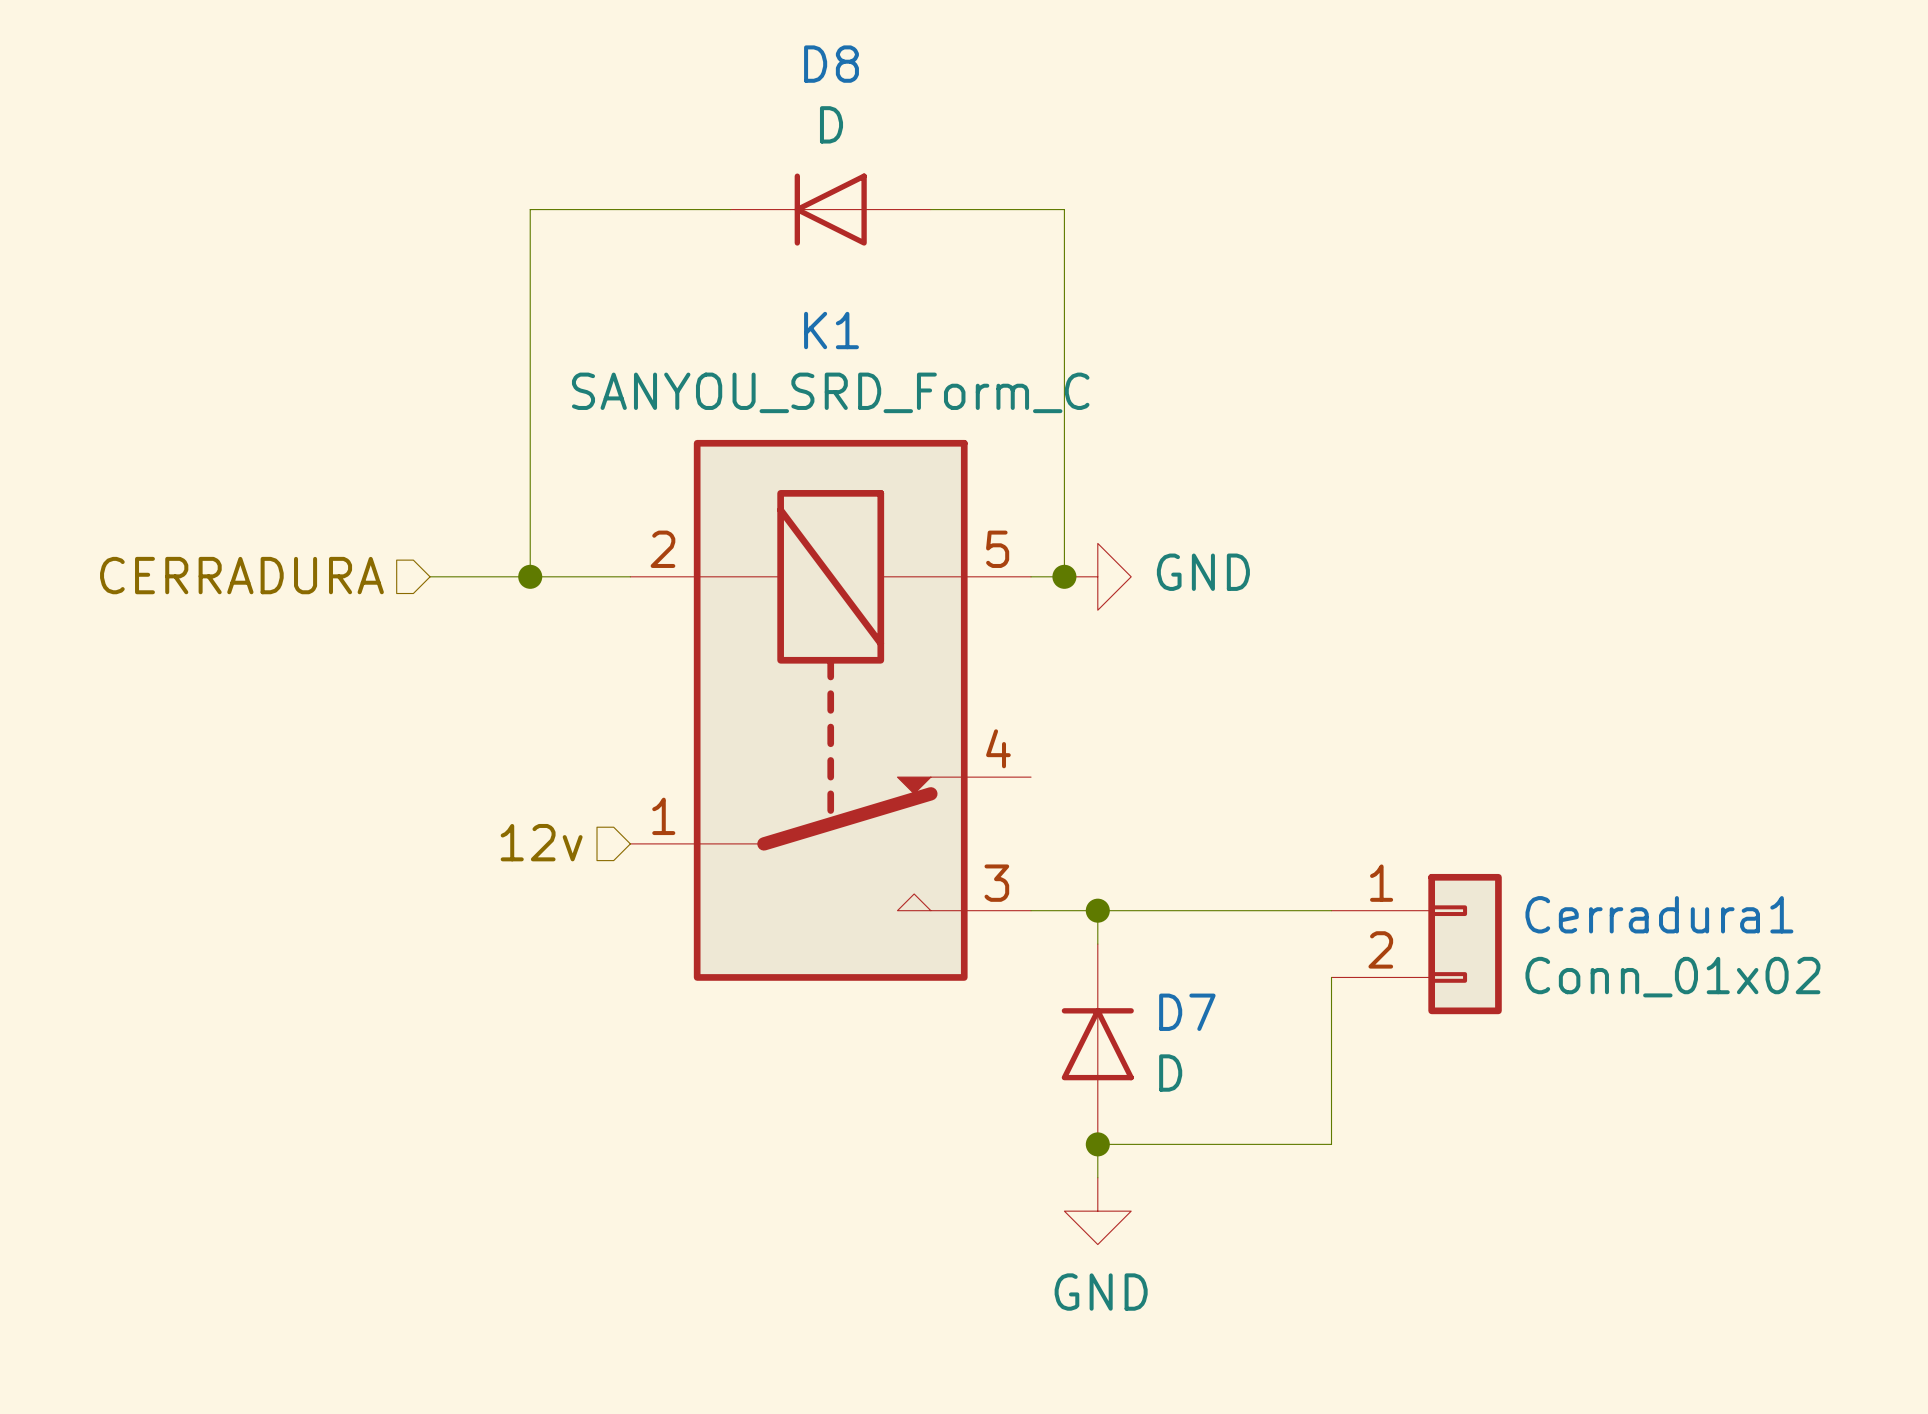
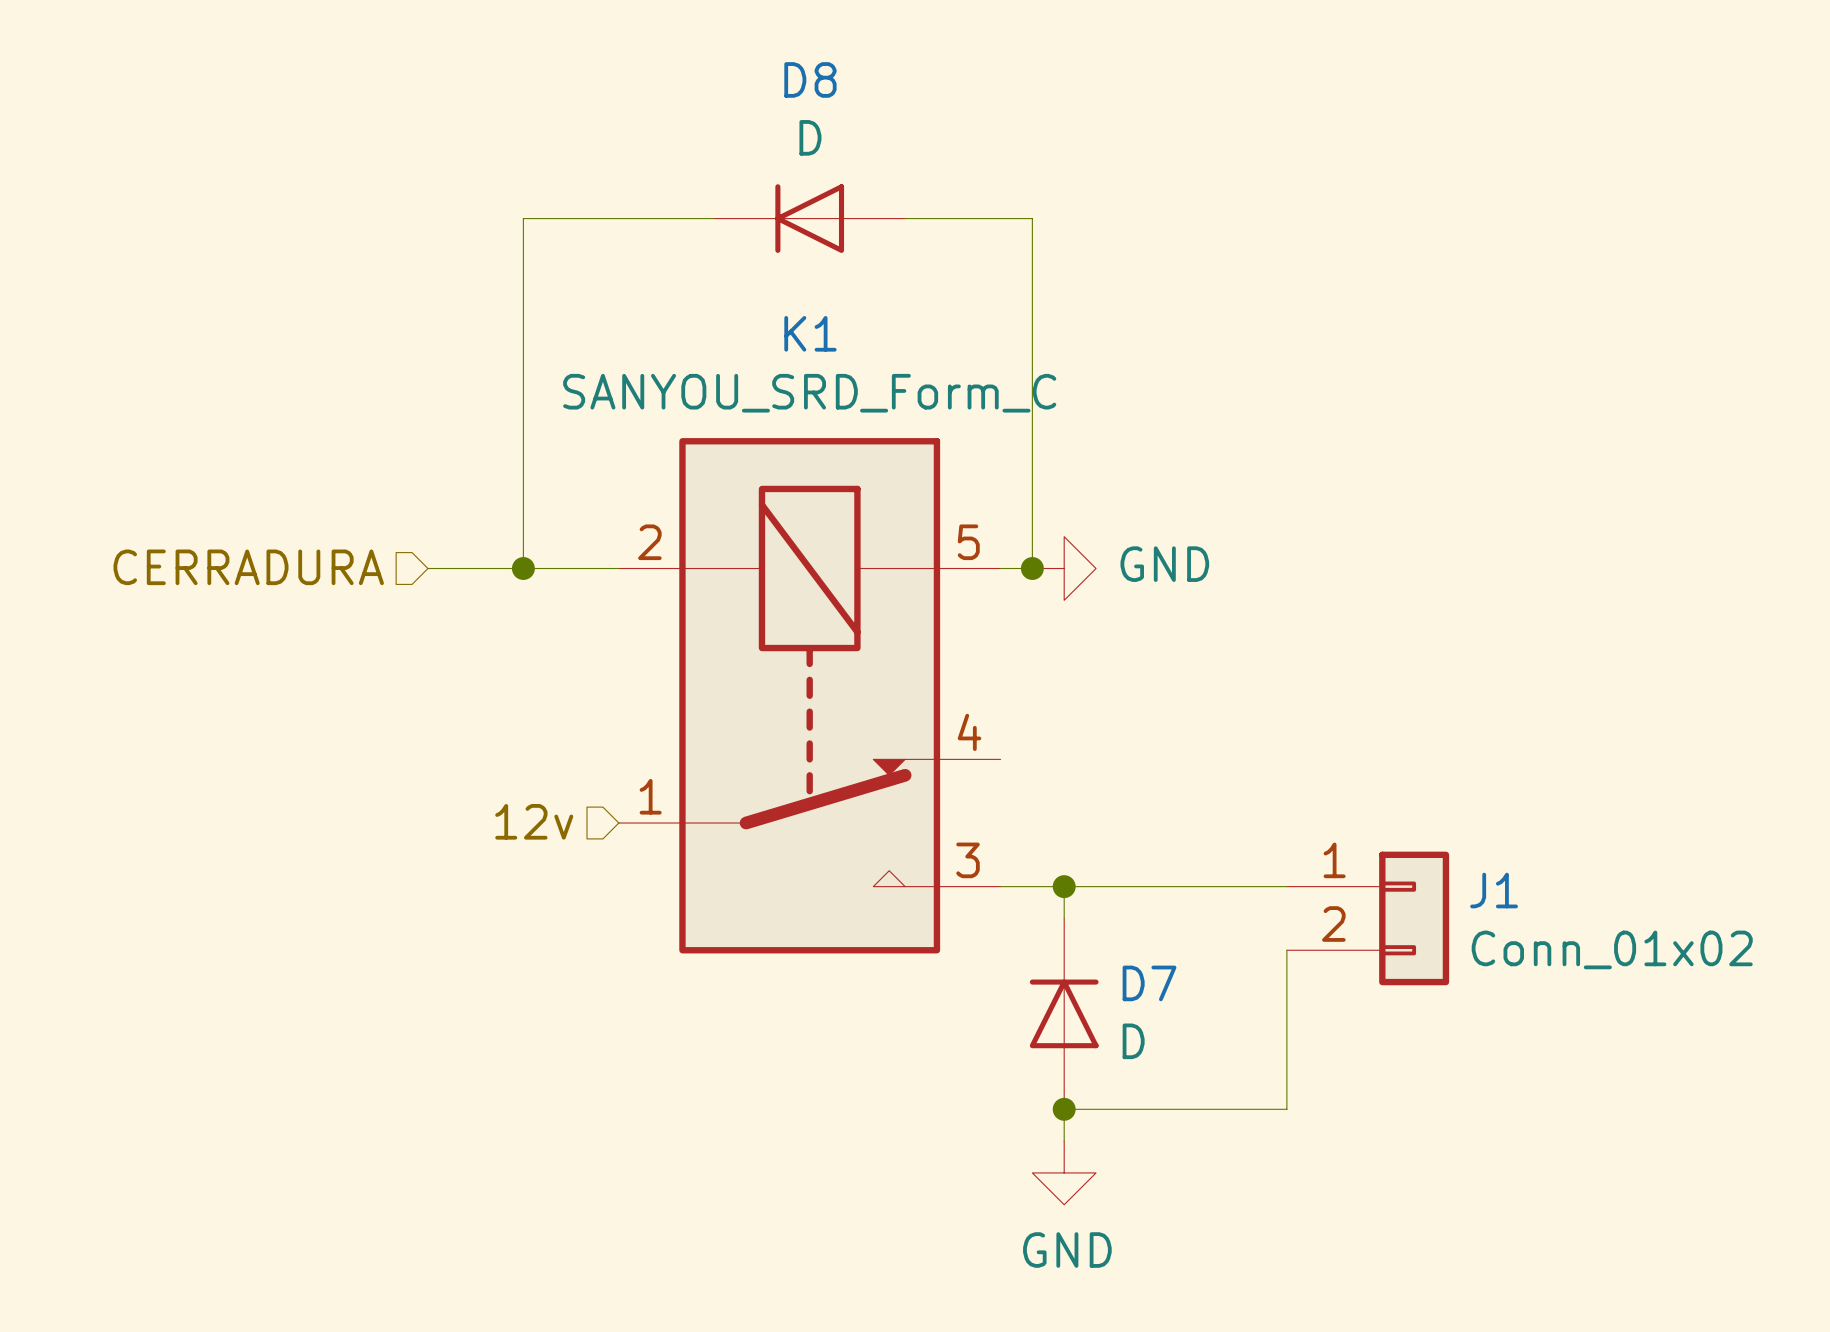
Cerradura1 name: Cerradura1 (1659, 914) -> J1 (1494, 890)

